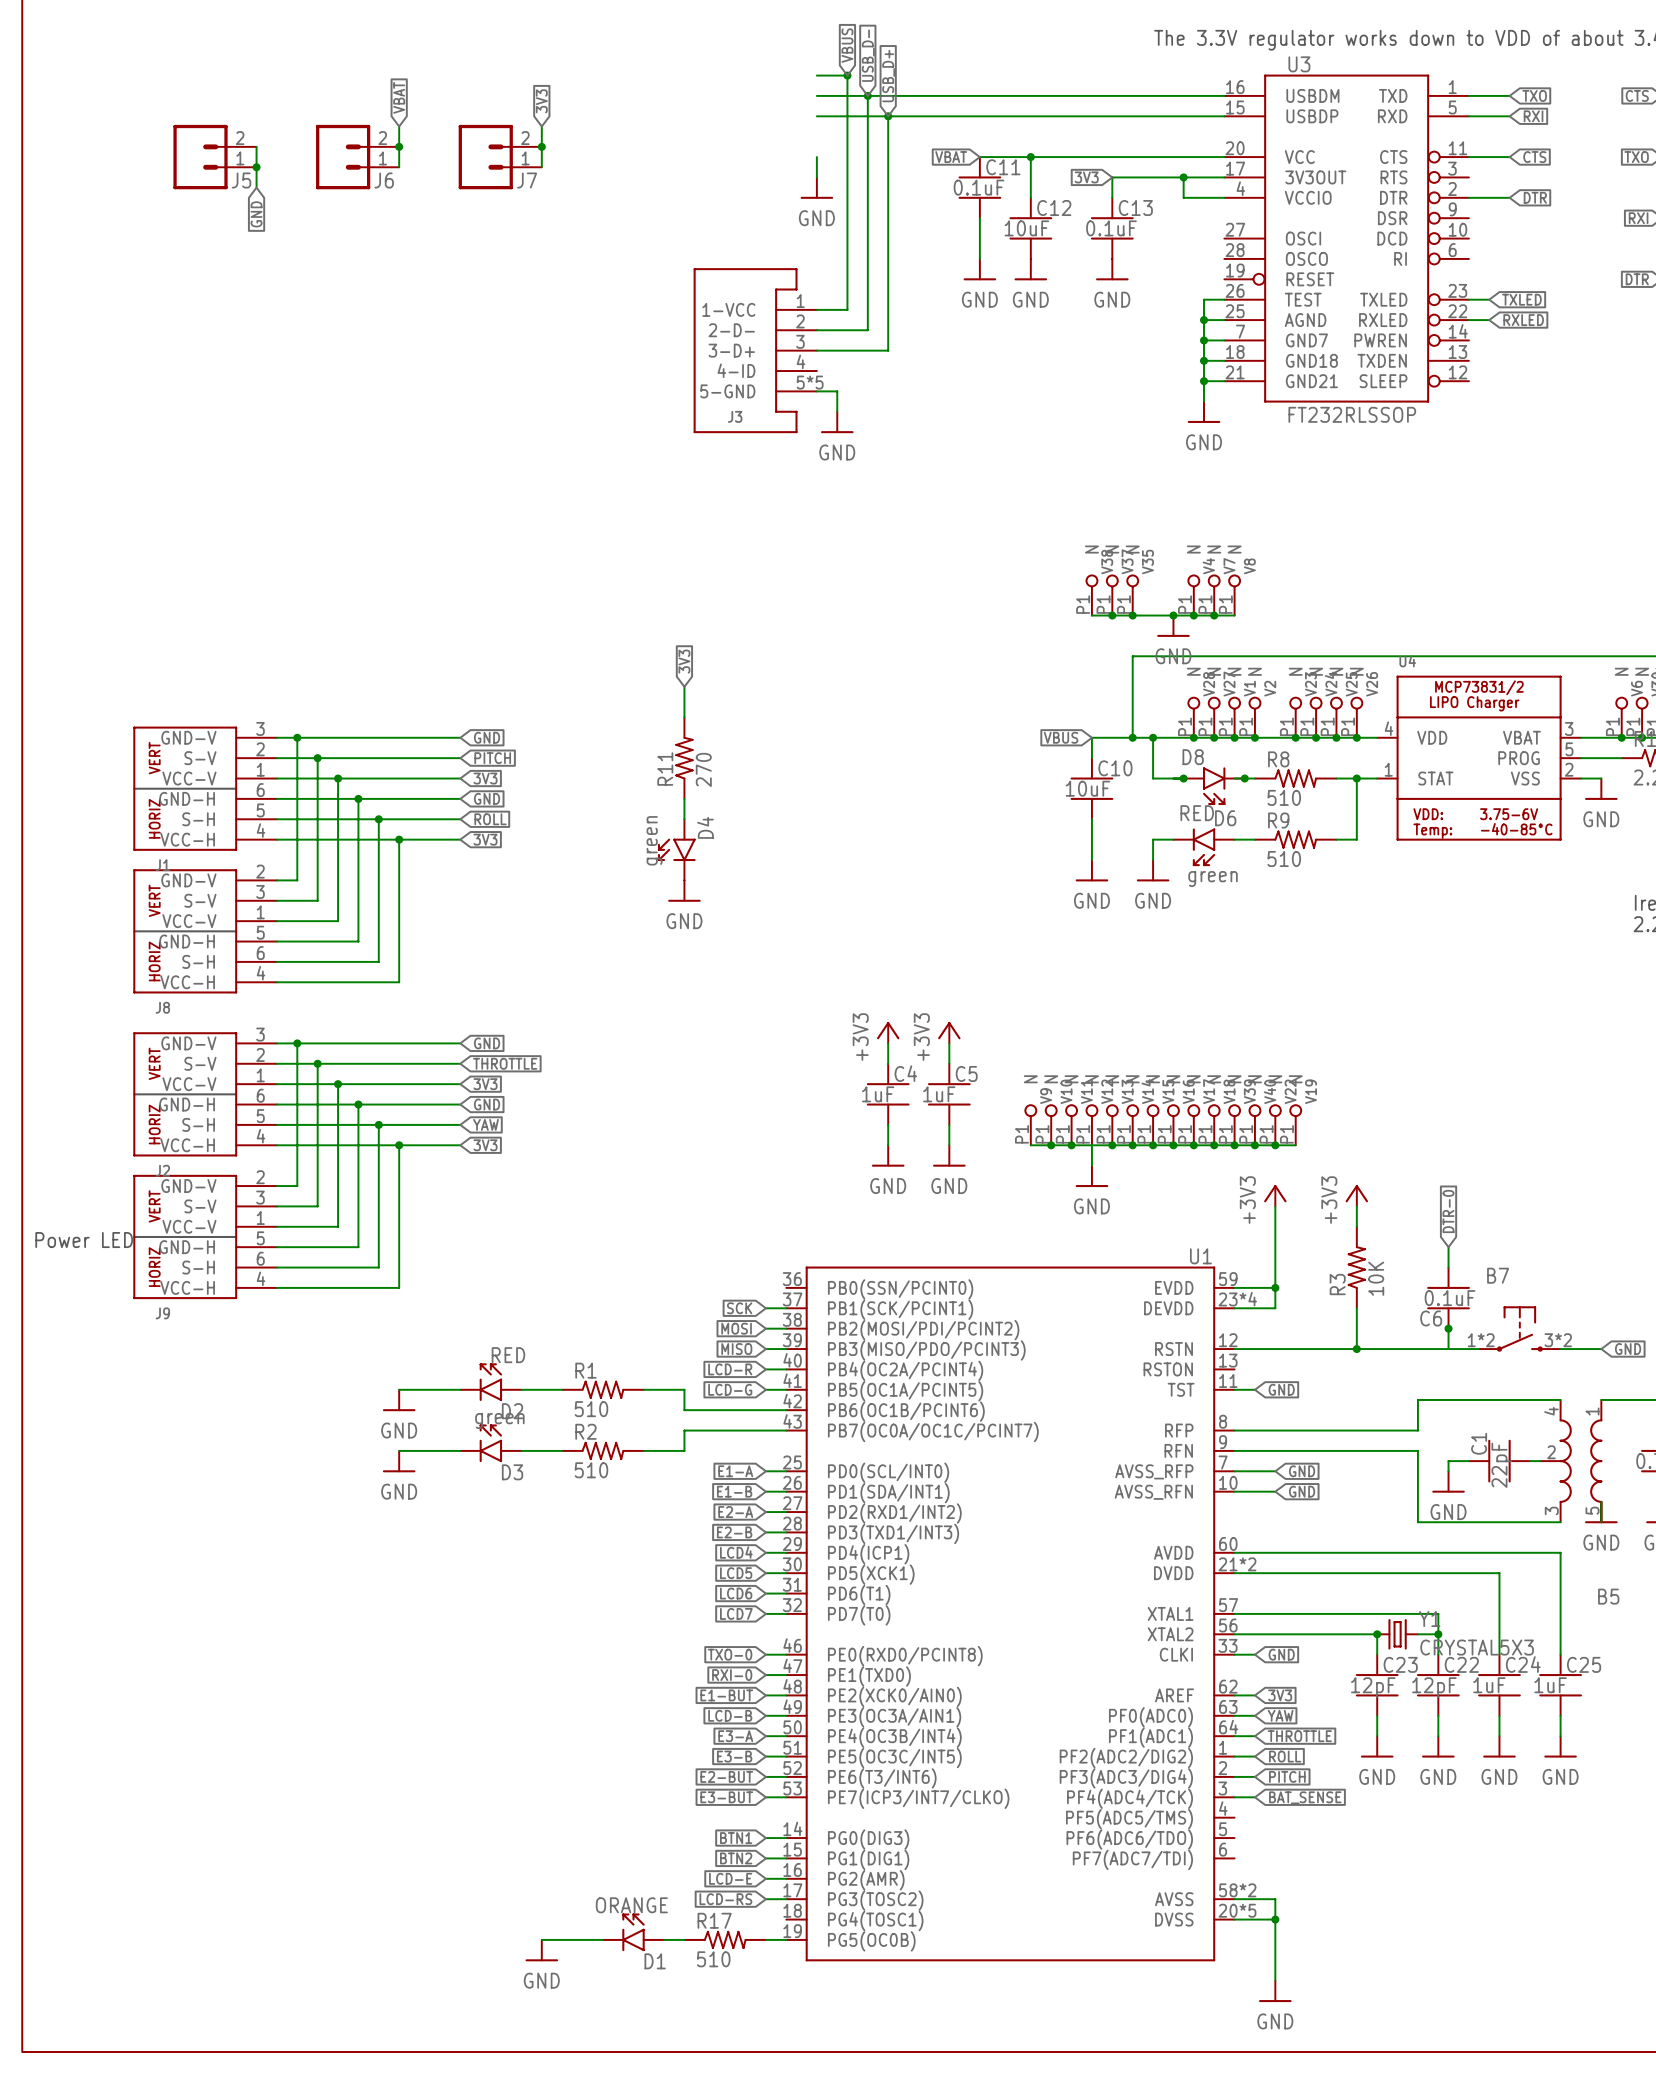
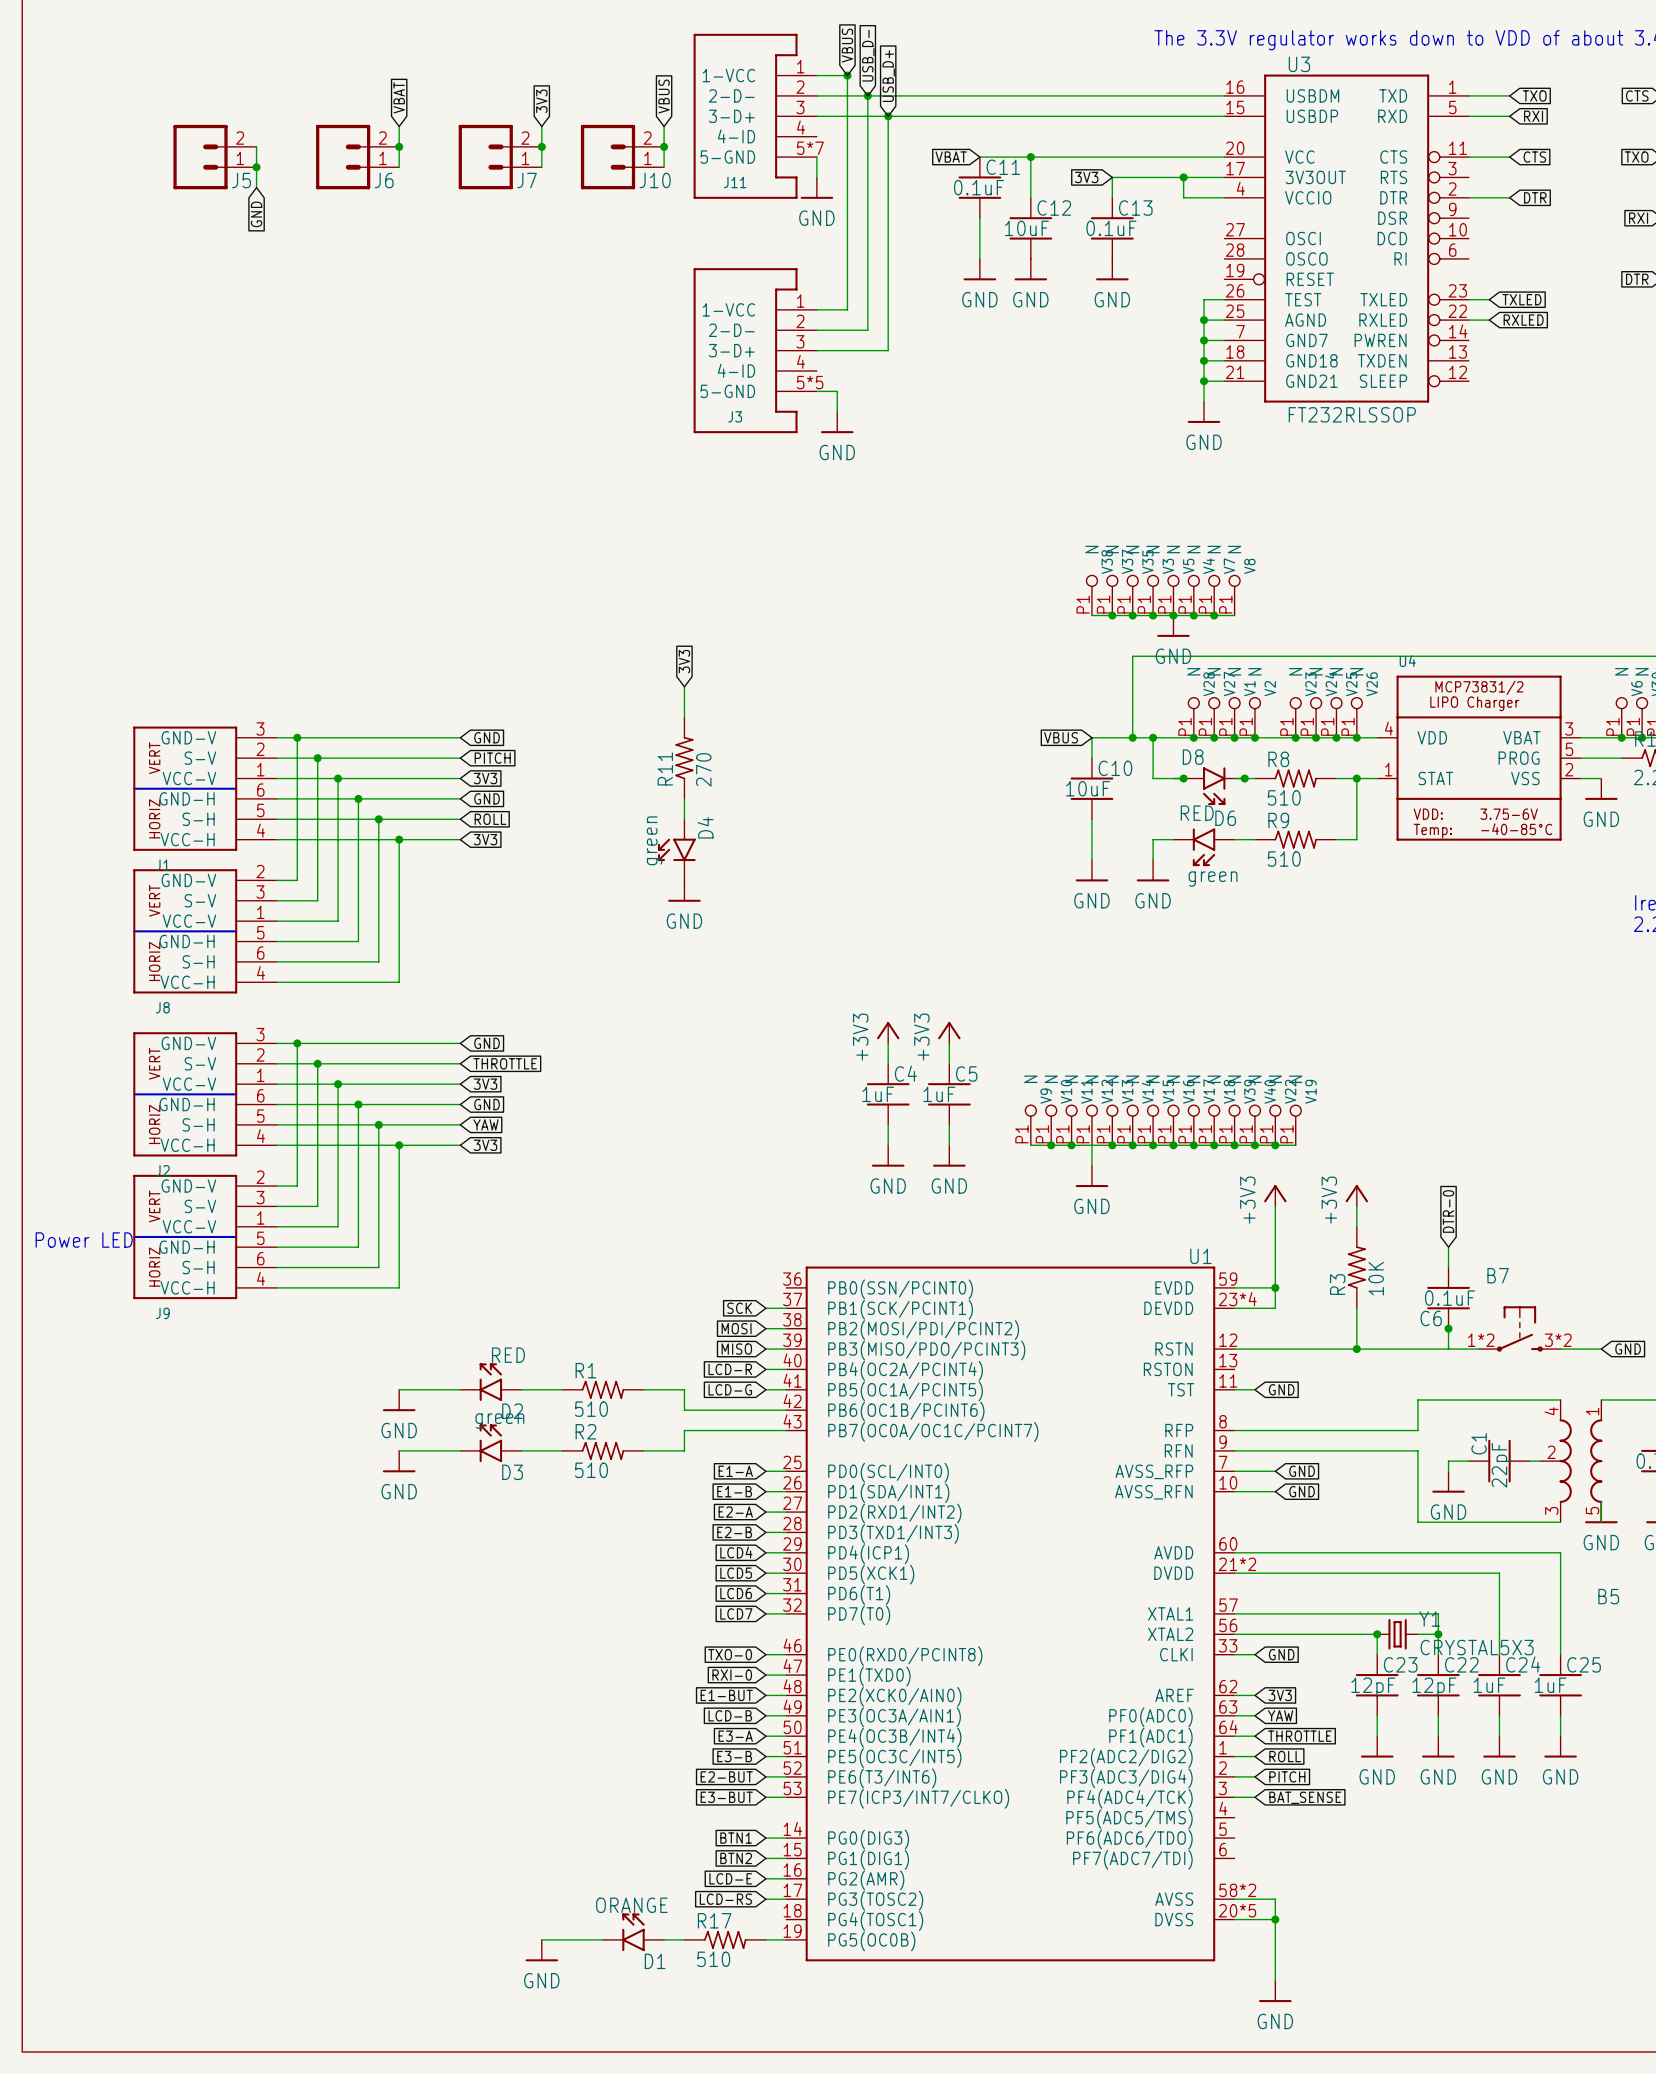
global label: none -> VBUS (664, 96)
J11: none -> (755, 116)
wire: none -> (664, 126) (664, 167)
junction: none -> (664, 146)
J10: none -> (622, 157)
V3: none -> (1153, 595)
V5: none -> (1173, 595)
junction: none -> (1153, 615)

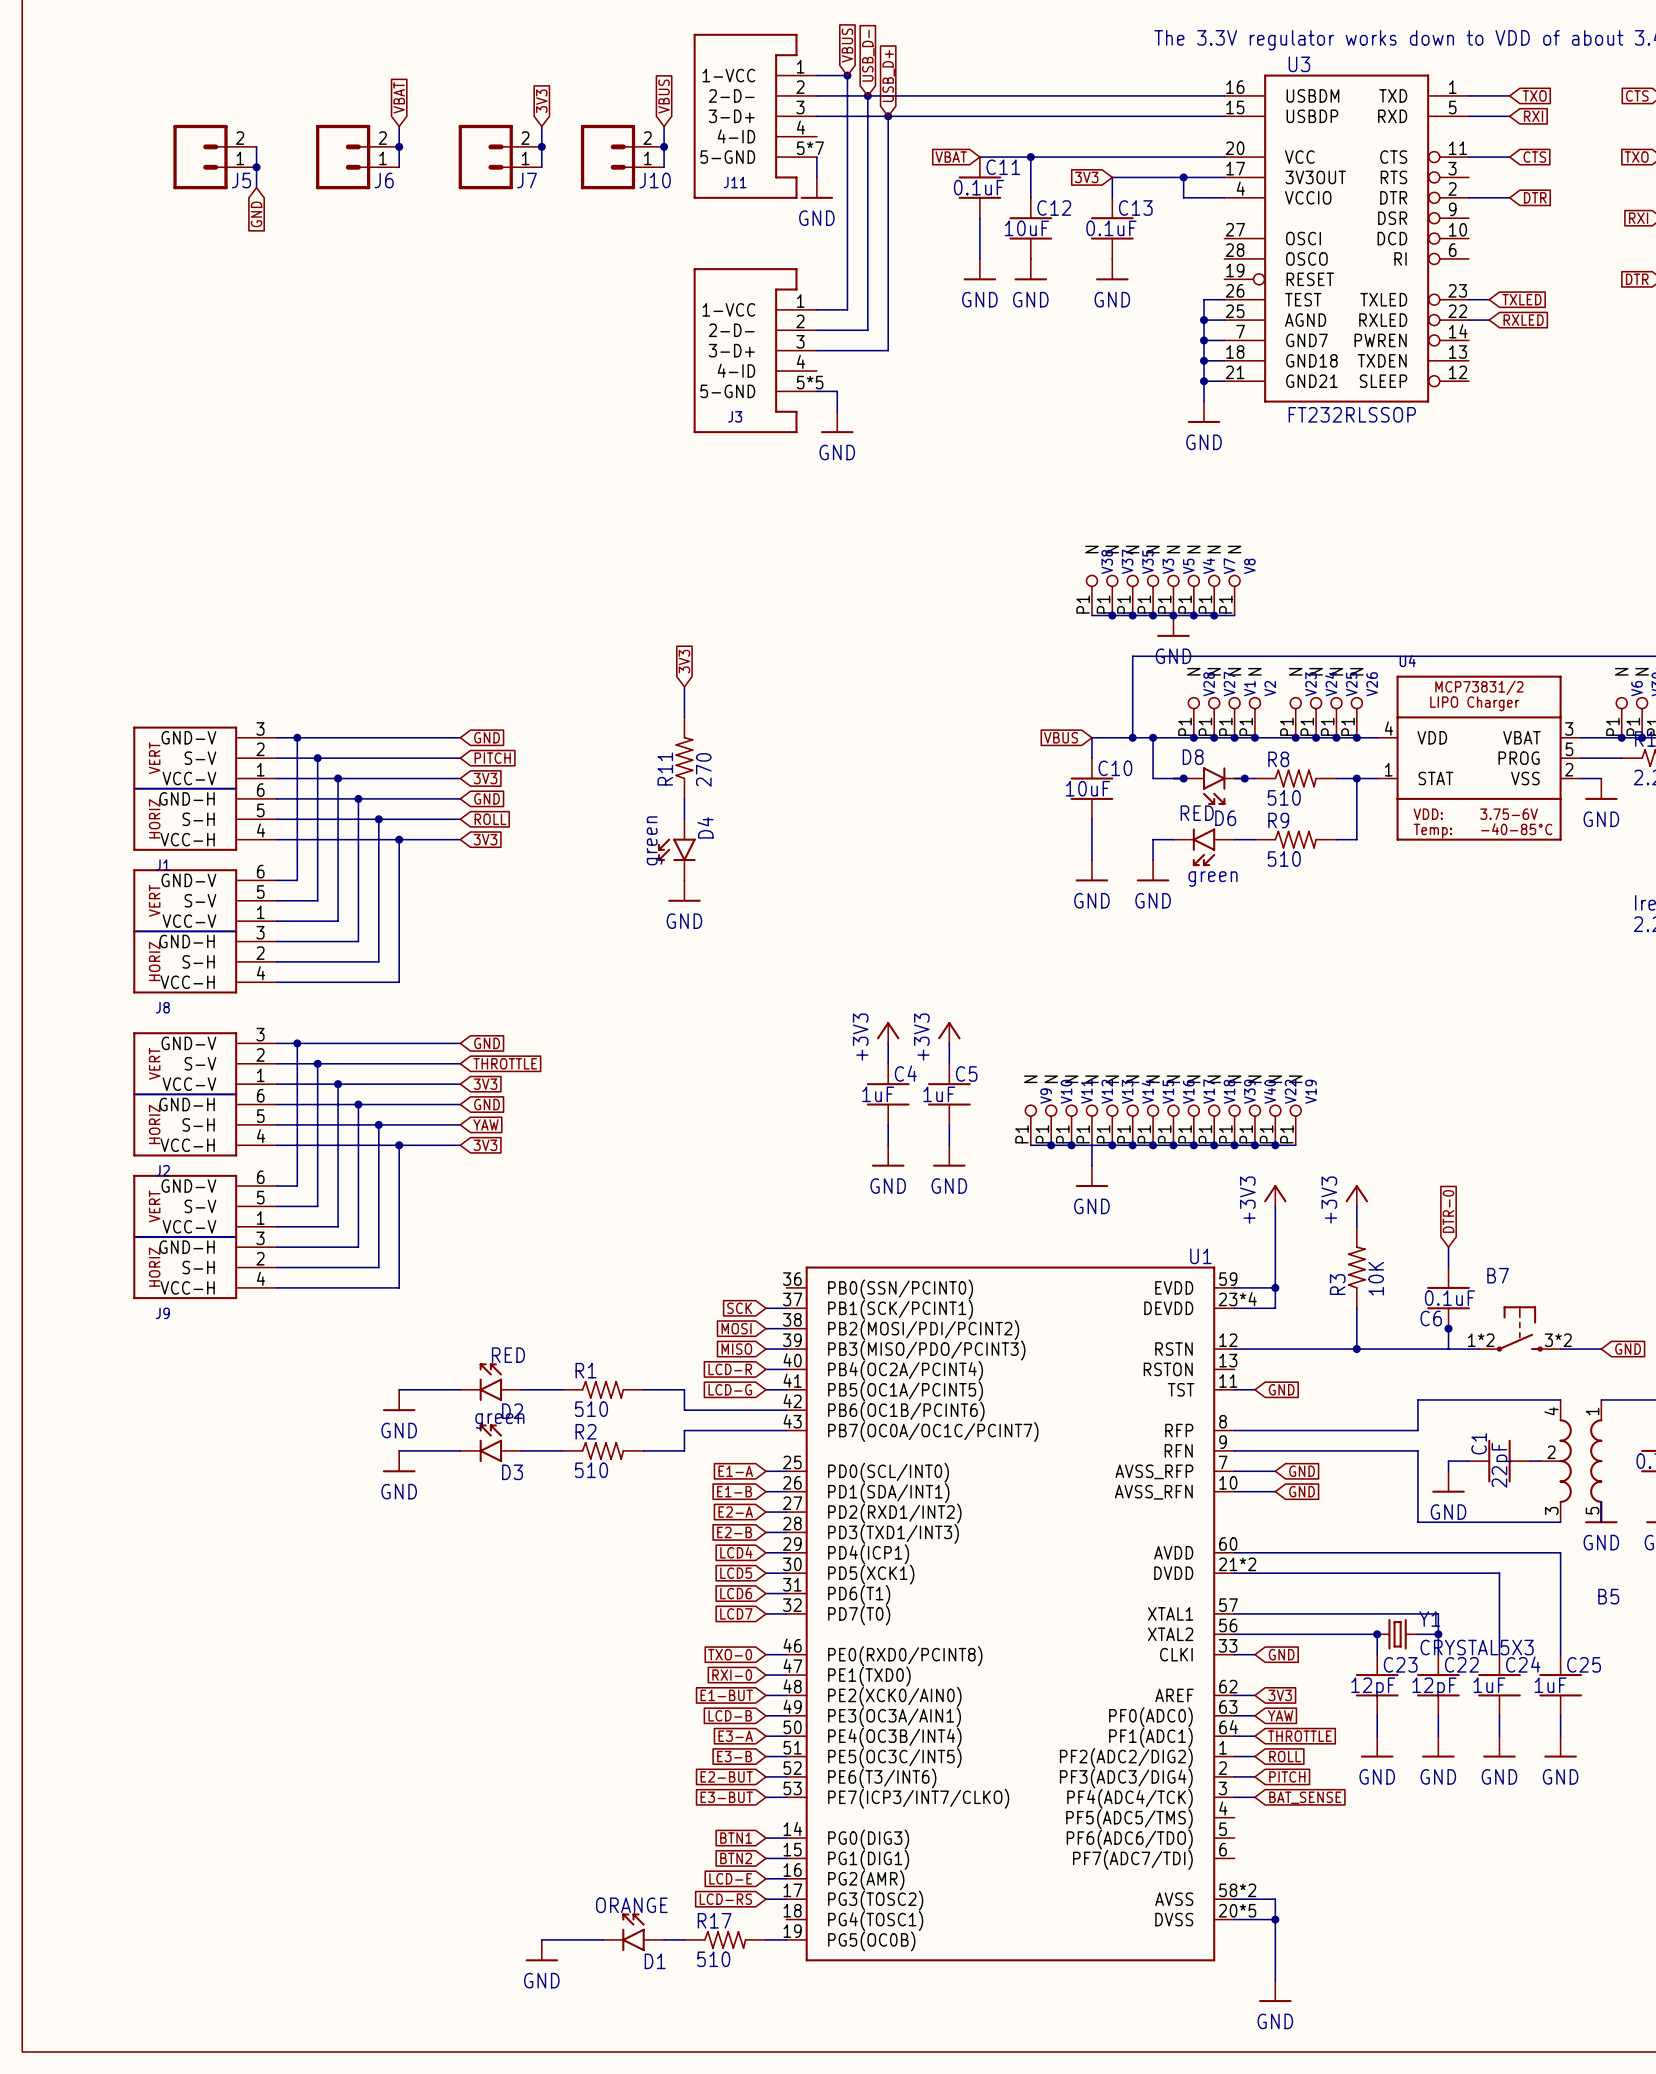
J8 pin number: 2 (260, 871) -> 6 (260, 871)
J8 pin number: 3 (260, 891) -> 5 (260, 891)
J8 pin number: 5 (260, 932) -> 3 (260, 932)
J8 pin number: 6 (260, 953) -> 2 (260, 953)
J9 pin number: 2 (260, 1177) -> 6 (260, 1177)
J9 pin number: 3 (260, 1197) -> 5 (260, 1197)
J9 pin number: 5 (260, 1238) -> 3 (260, 1238)
text: Power LED (84, 1240) -> none
J9 pin number: 6 (260, 1258) -> 2 (260, 1258)

